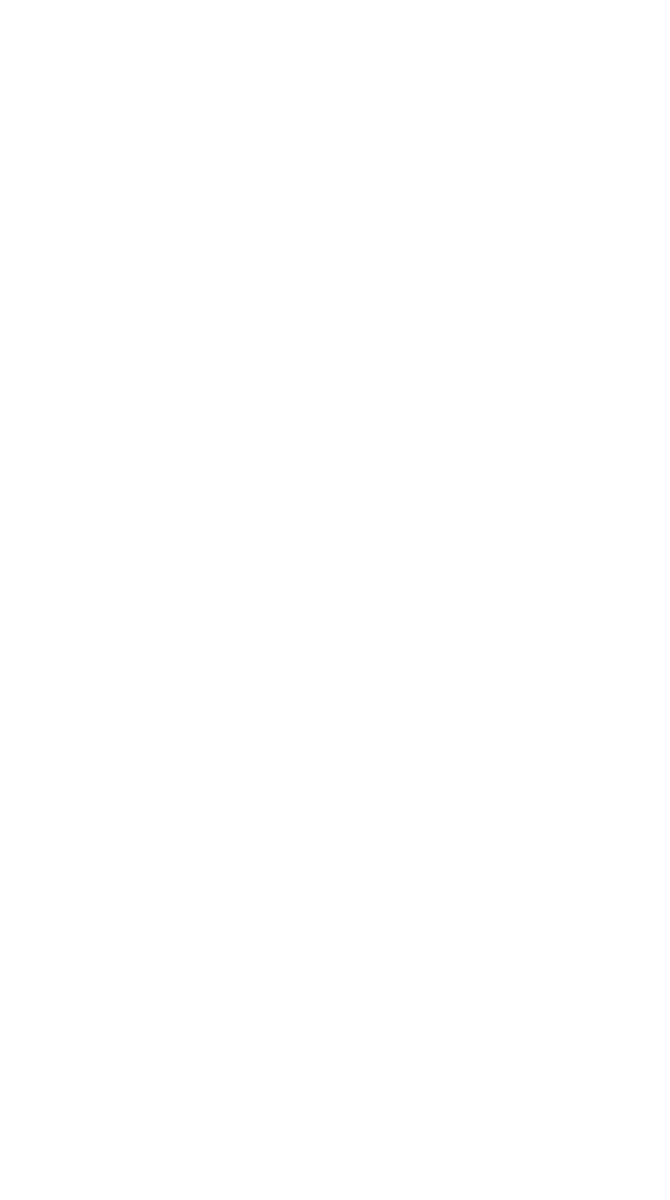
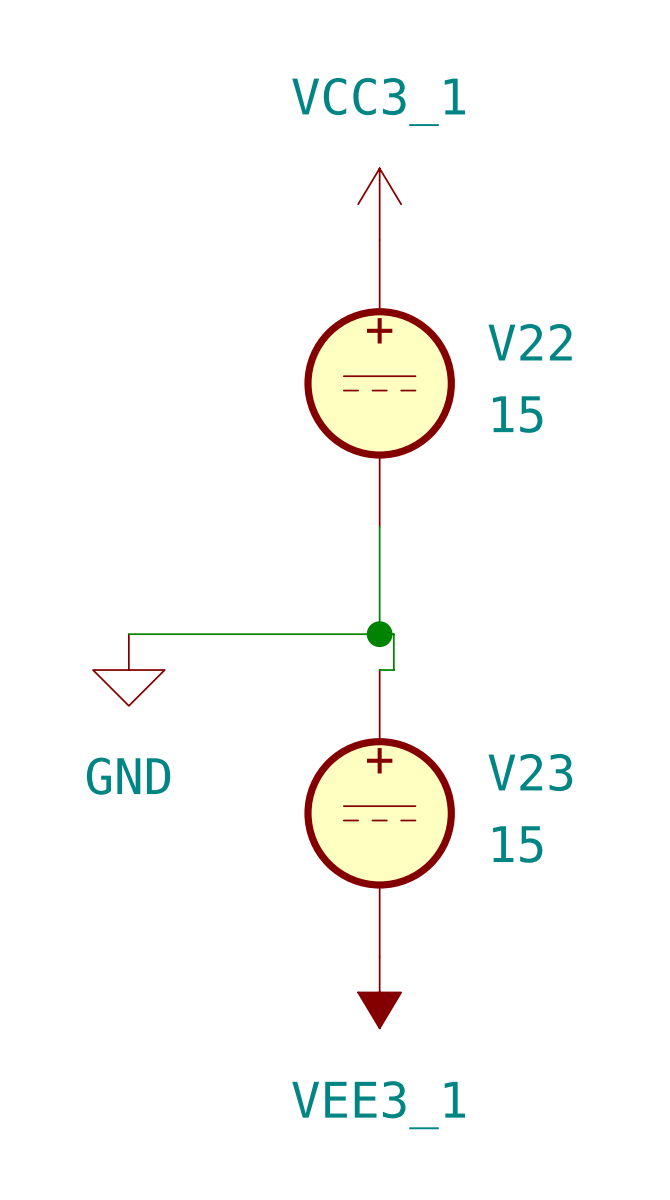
power symbol: none -> VCC3_1 (379, 204)
V22: none -> 15 (379, 383)
wire: none -> (379, 526) (379, 634)
wire: none -> (128, 634) (393, 634) (393, 670) (379, 670)
junction: none -> (379, 634)
power symbol: none -> GND (128, 670)
V23: none -> 15 (379, 813)
power symbol: none -> VEE3_1 (379, 992)

